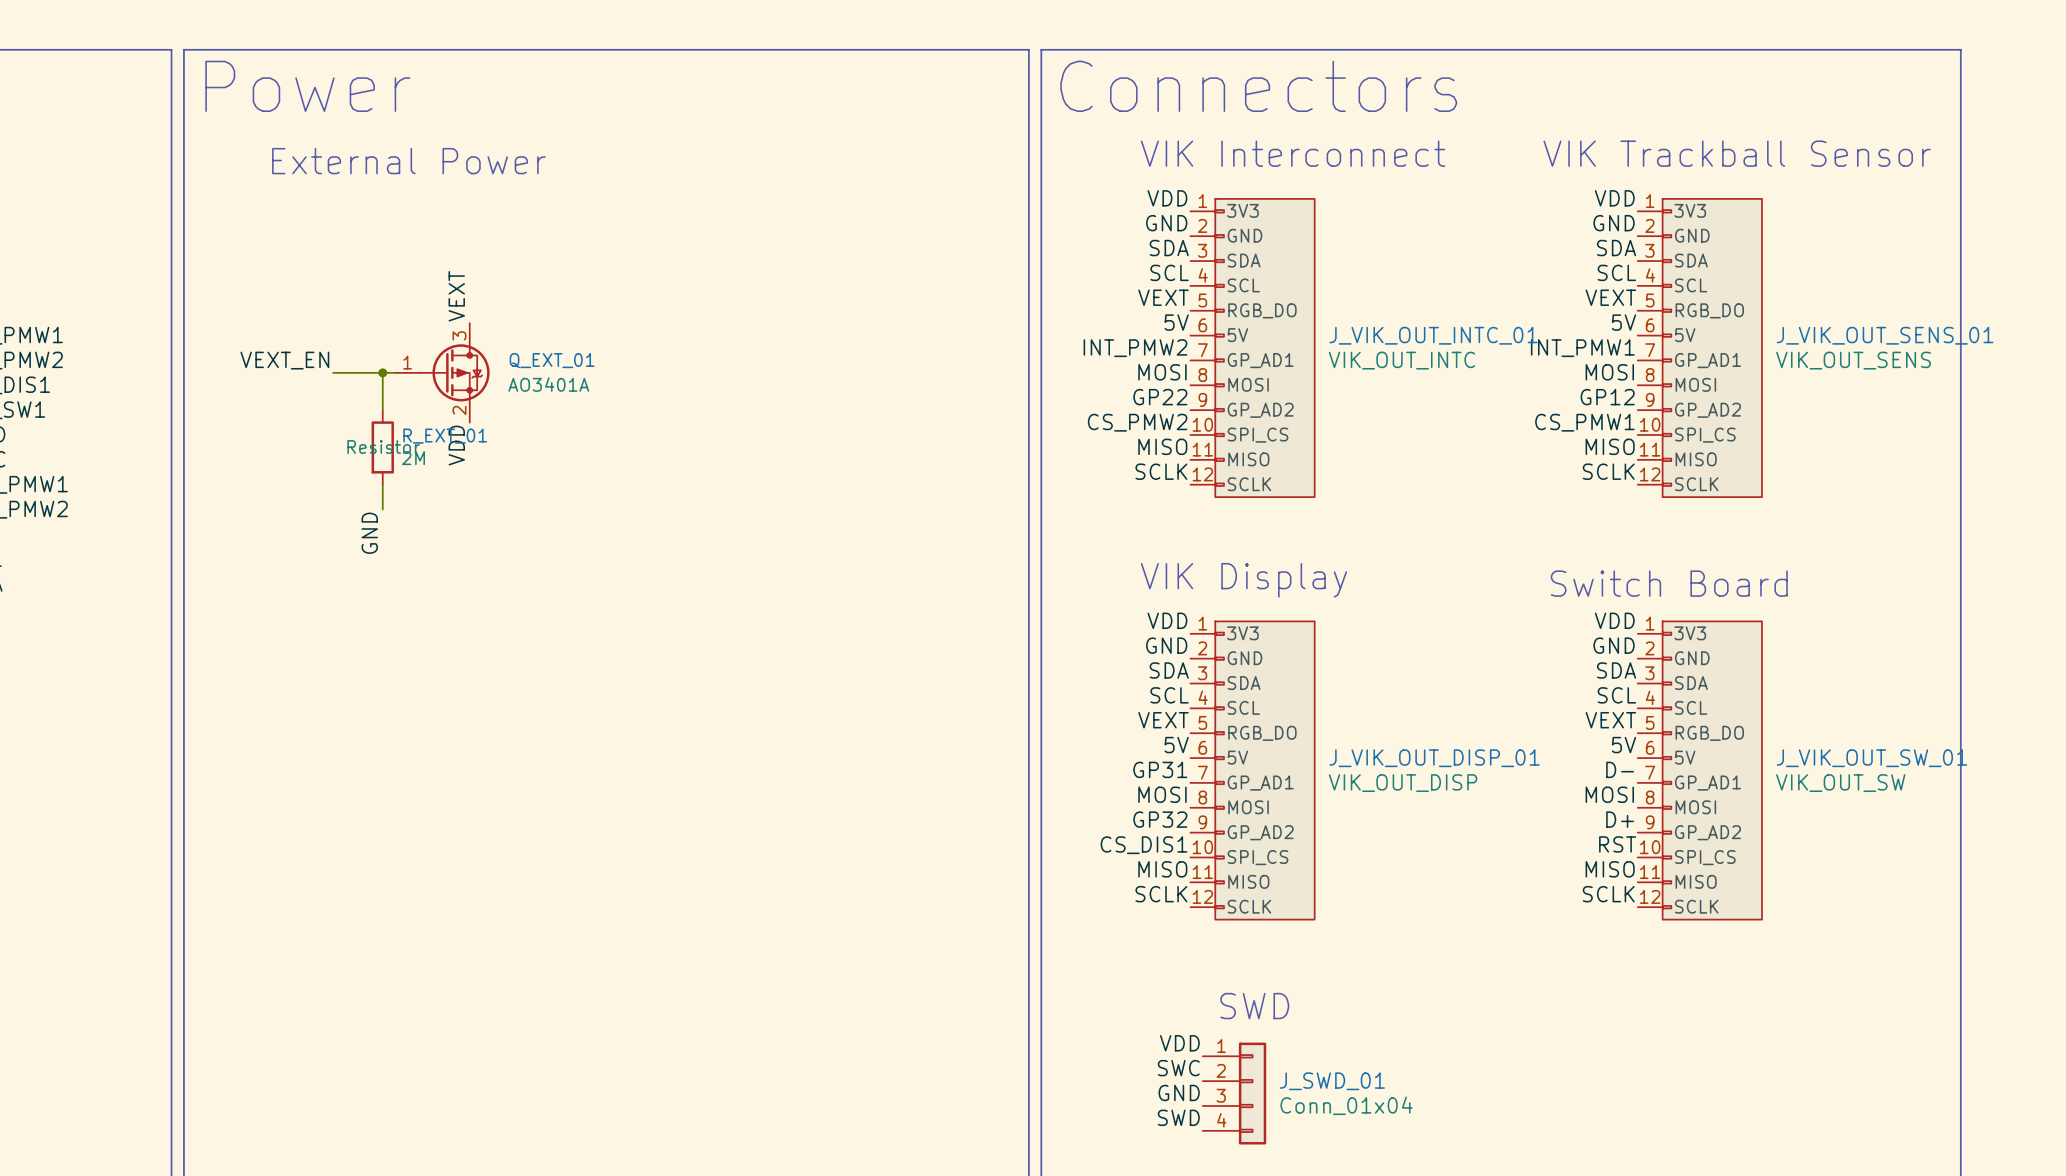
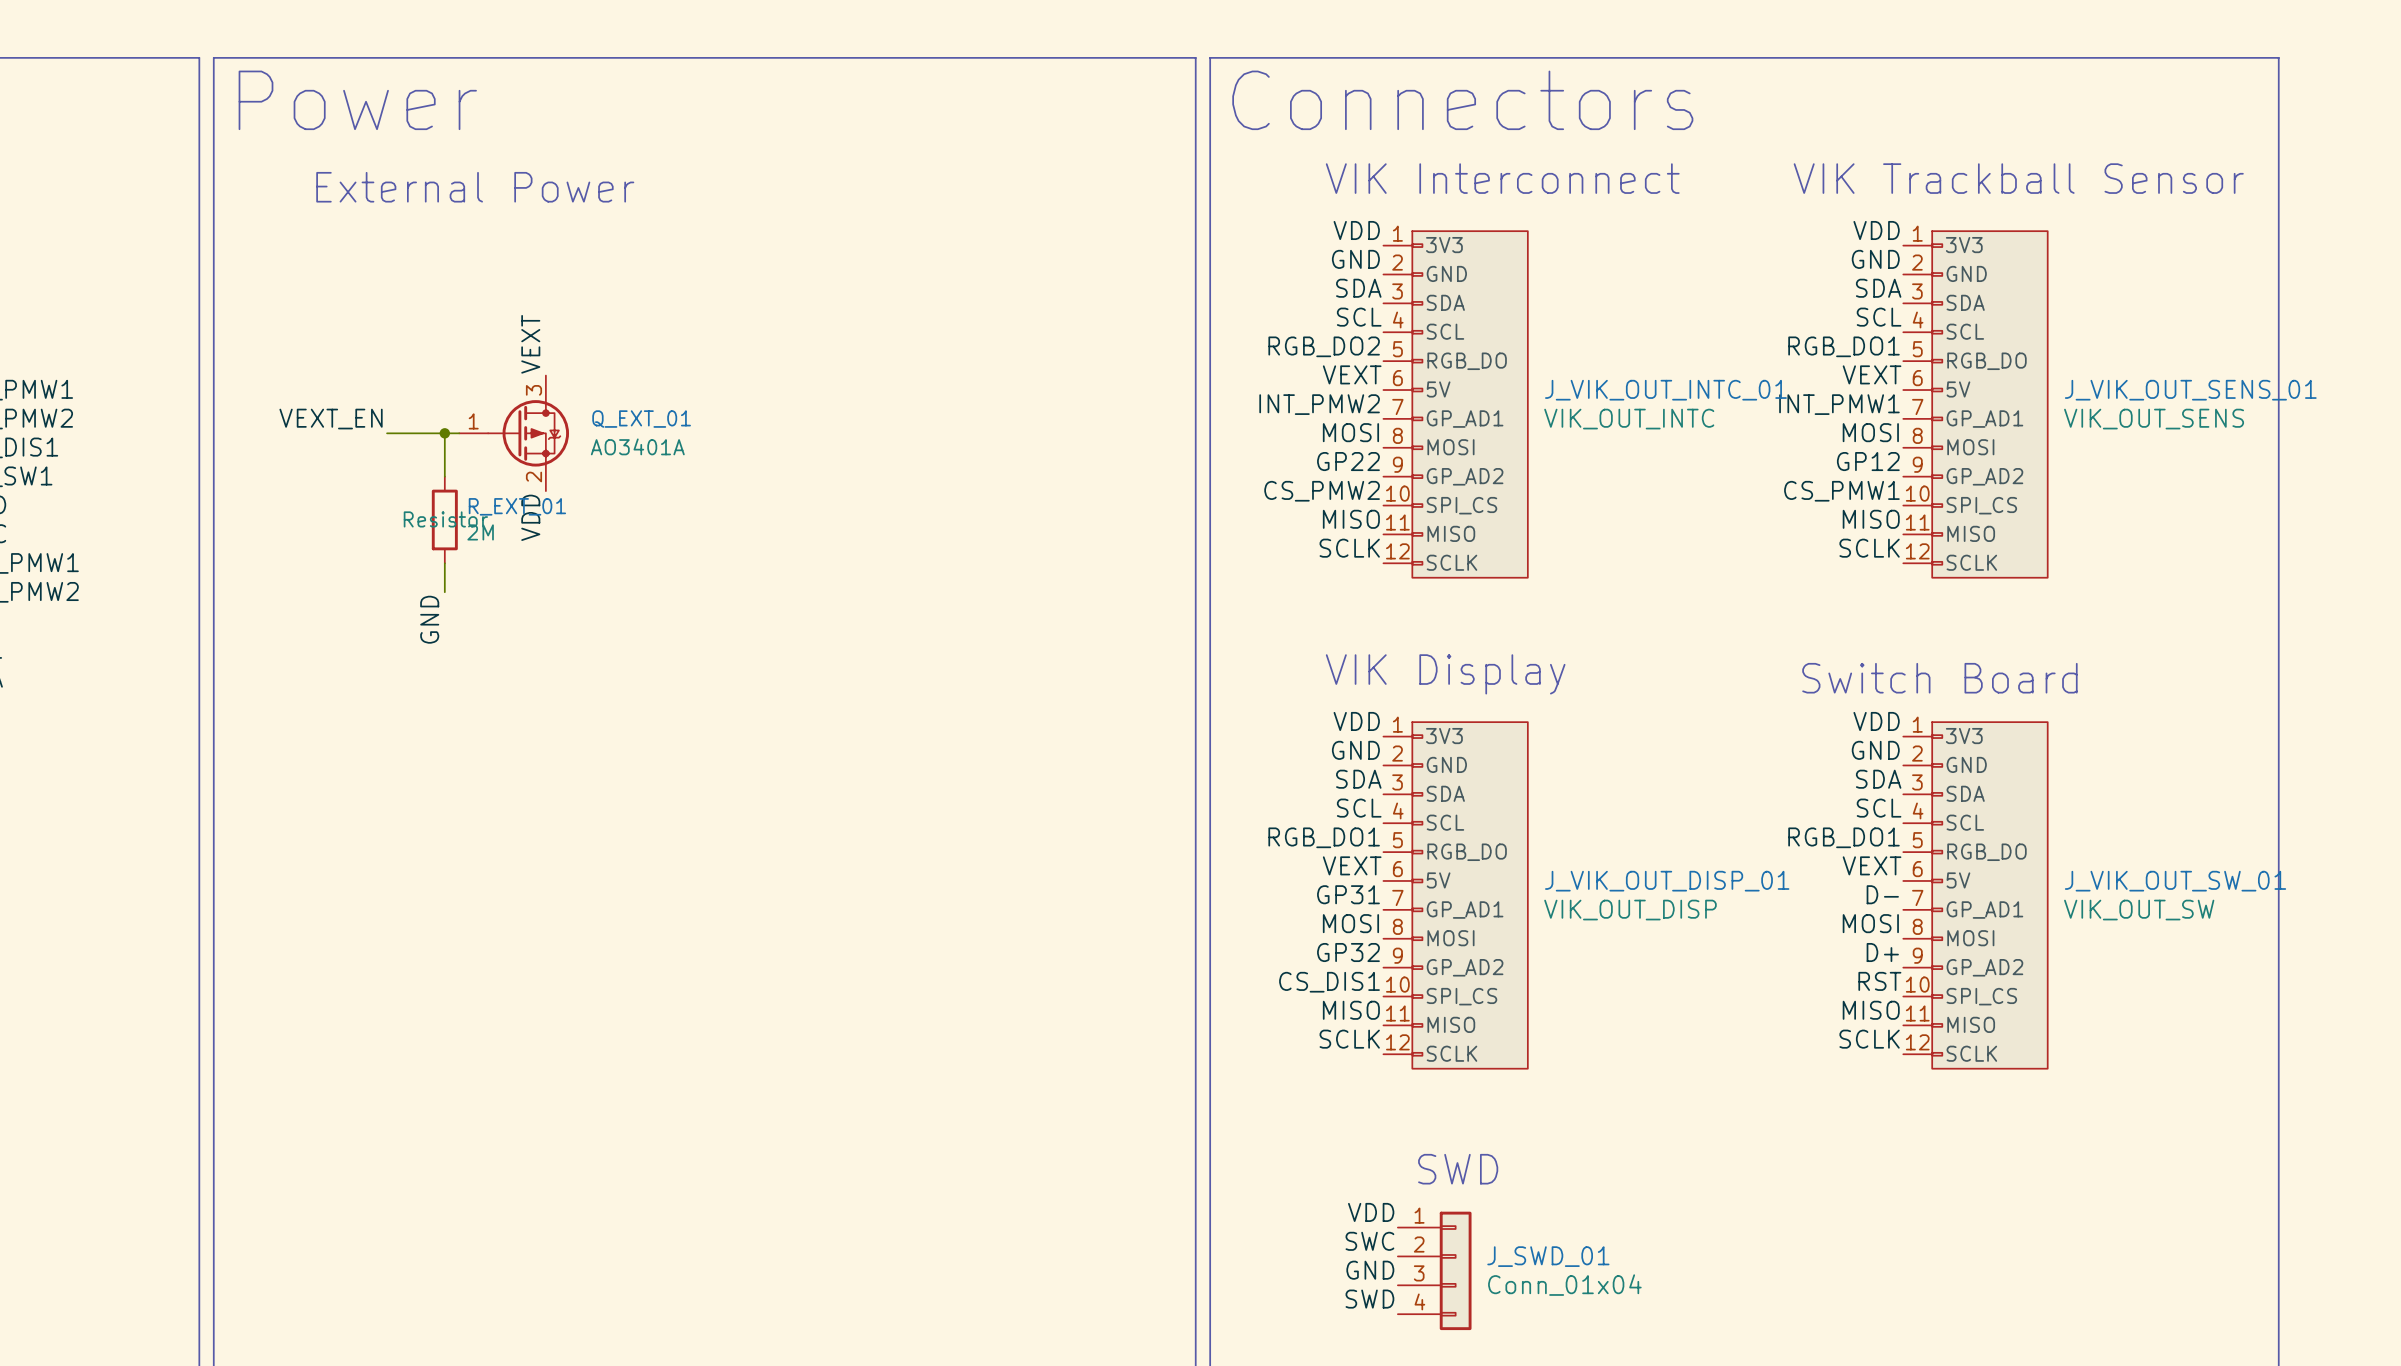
label: VEXT (1163, 297) -> RGB_DO2 (1324, 346)
label: VEXT (1610, 297) -> RGB_DO1 (1843, 346)
label: 5V (1176, 322) -> VEXT (1352, 374)
label: 5V (1623, 322) -> VEXT (1872, 374)
label: VEXT (1163, 720) -> RGB_DO1 (1324, 837)
label: VEXT (1610, 720) -> RGB_DO1 (1843, 837)
label: 5V (1176, 745) -> VEXT (1352, 865)
label: 5V (1623, 745) -> VEXT (1872, 865)

